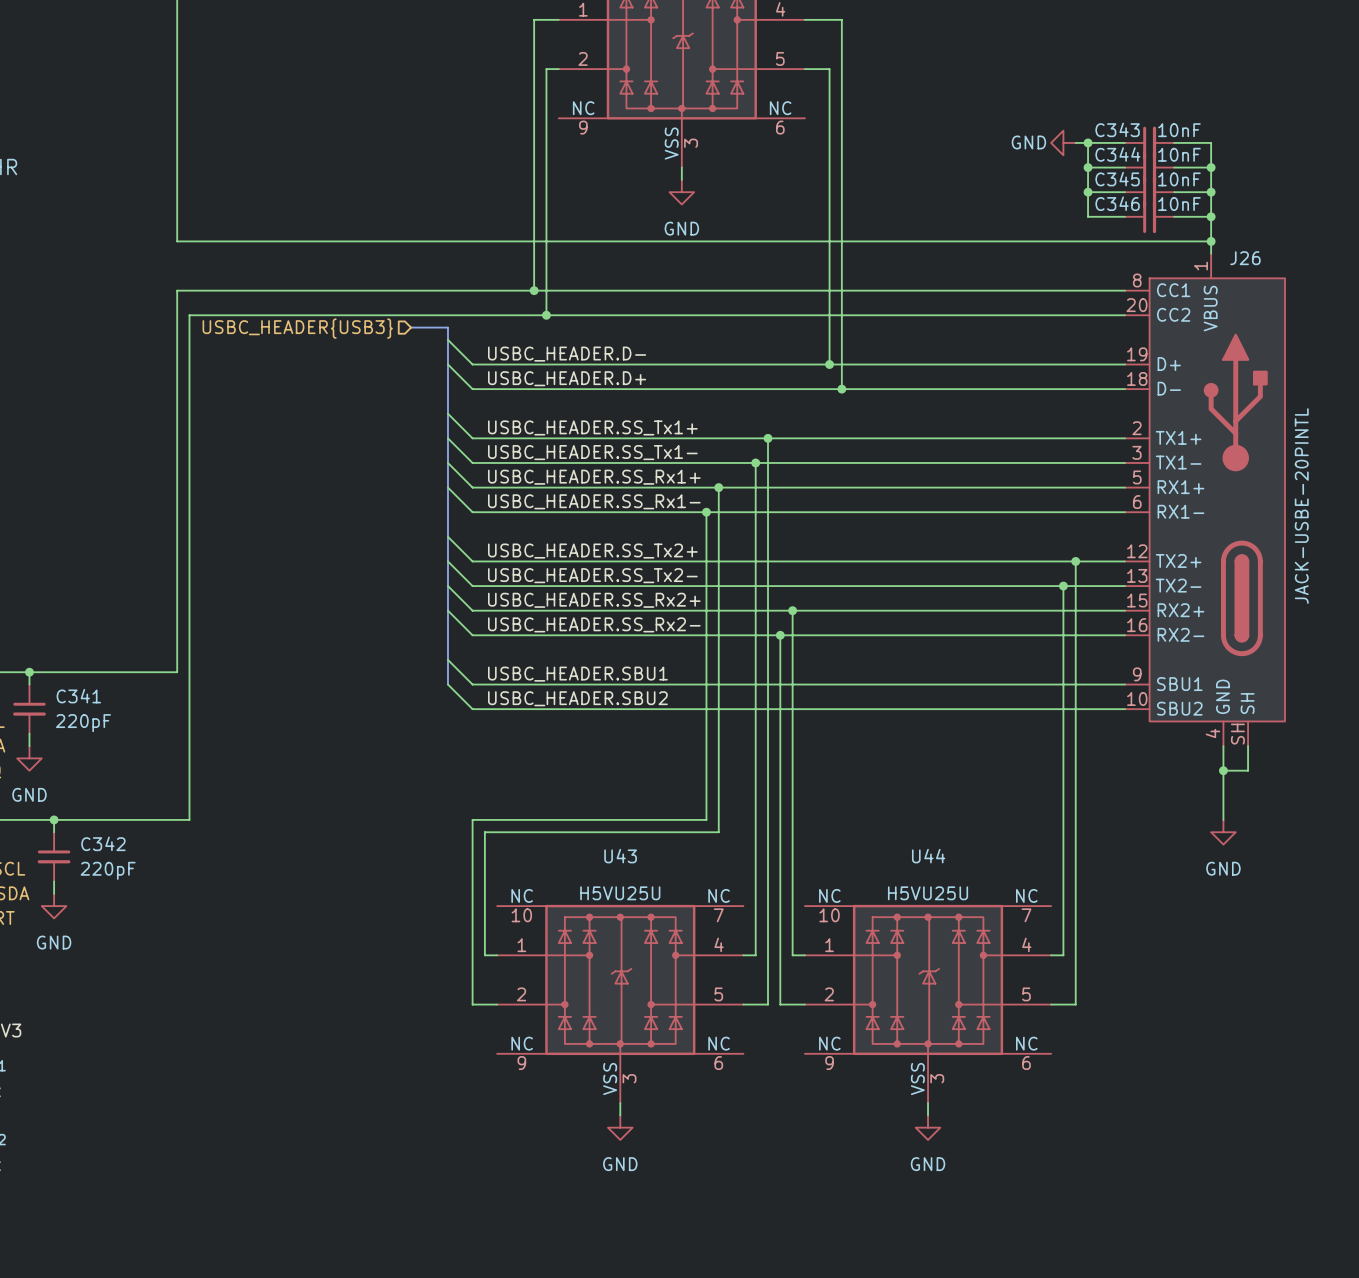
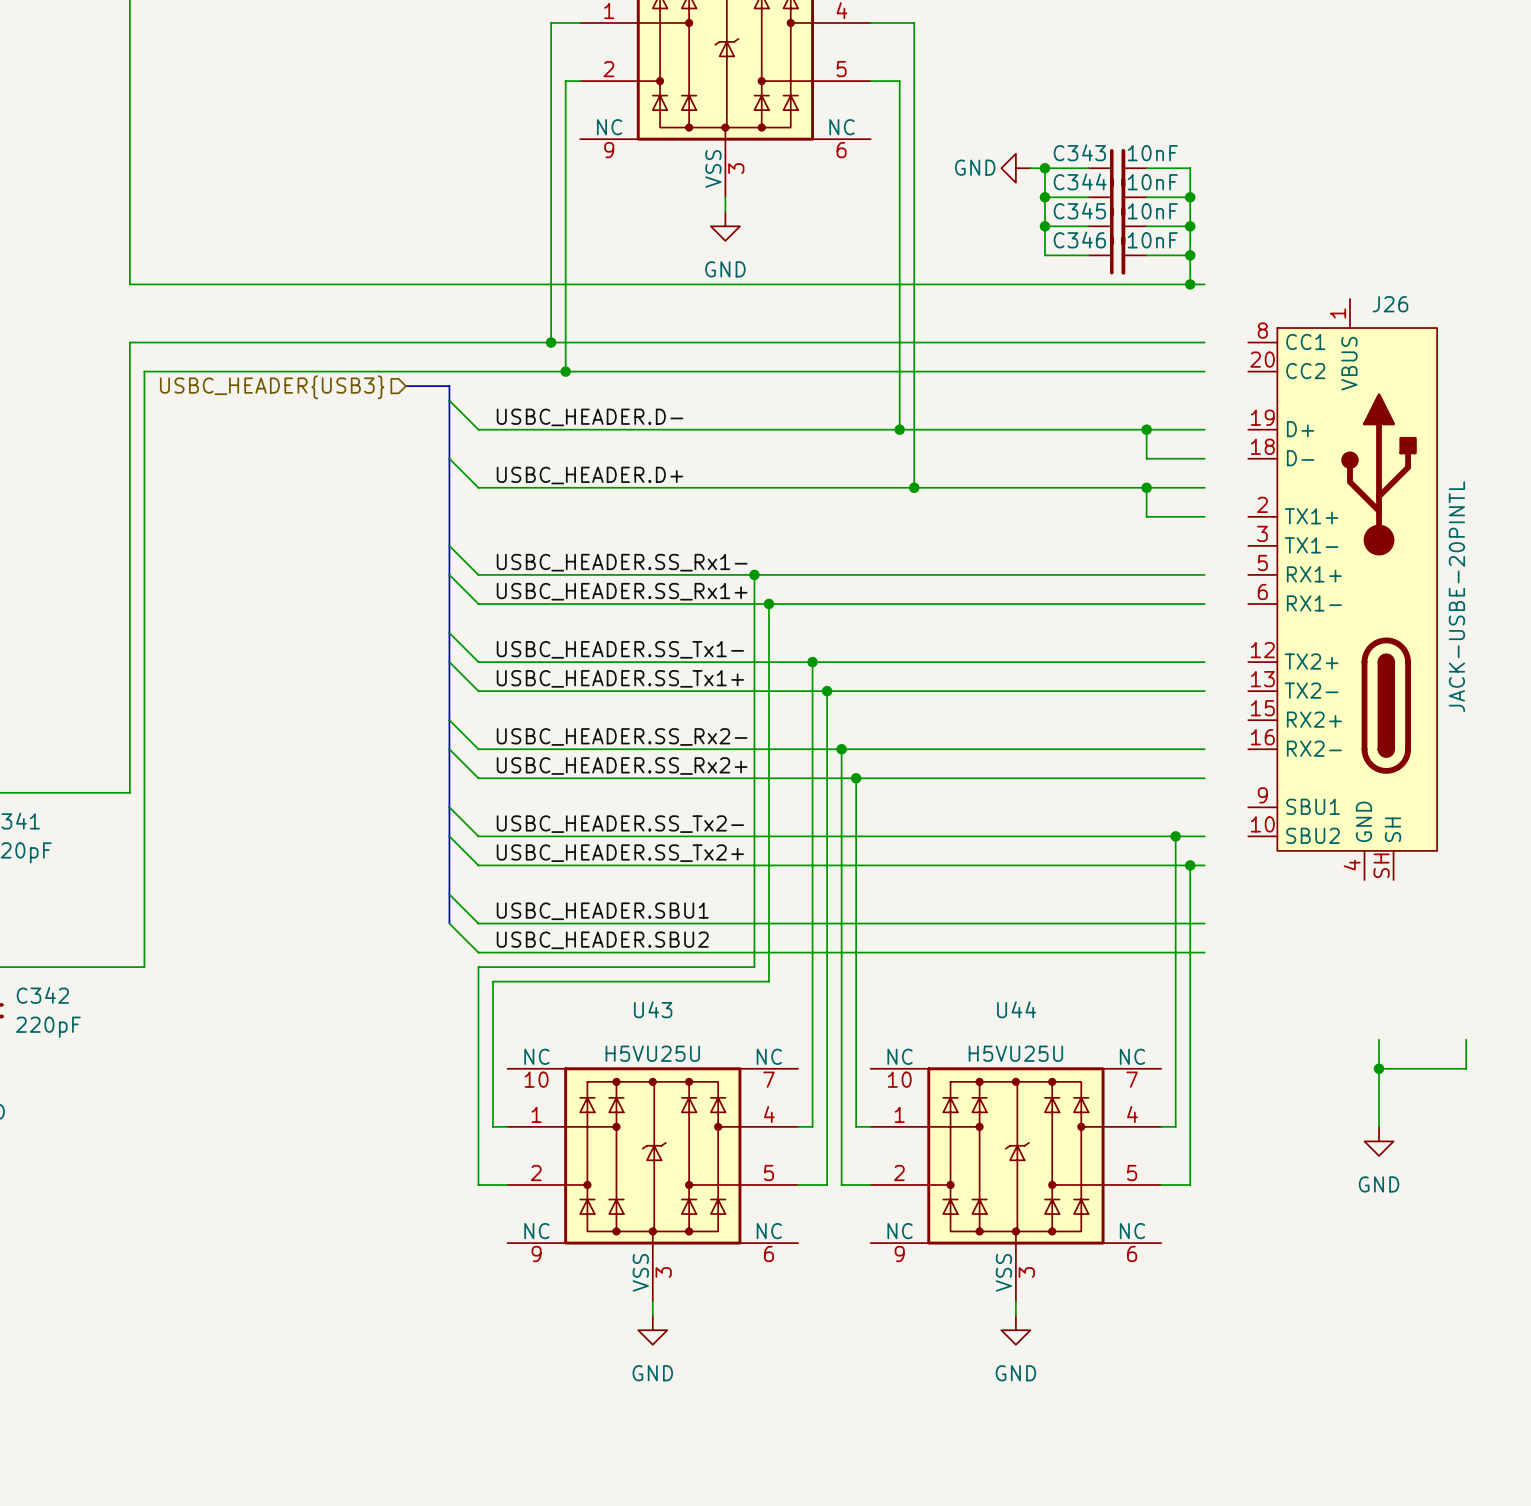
junction: none -> (1044, 168)
wire: none -> (1146, 168) (1190, 168) (1190, 284)
power symbol position: GND (1063, 142) -> GND (1015, 168)
wire: (1075, 142) (1124, 142) -> (1030, 168) (1088, 168)
wire: (1088, 142) (1088, 216) (1124, 216) -> (1044, 168) (1044, 255) (1088, 255)
junction: (1088, 142) -> none
C343 position: (1149, 142) -> (1117, 168)
wire: (1174, 142) (1211, 142) (1211, 253) -> none
junction: none -> (1044, 197)
wire: (1088, 167) (1124, 167) -> (1044, 197) (1088, 197)
junction position: (1088, 167) -> (1190, 197)
C344 position: (1149, 167) -> (1117, 197)
wire: (1174, 167) (1211, 167) -> (1146, 197) (1190, 197)
junction: (1211, 167) -> none
junction: none -> (1044, 226)
wire: (1088, 192) (1124, 192) -> (1044, 226) (1088, 226)
junction position: (1088, 192) -> (1190, 226)
C345 position: (1149, 192) -> (1117, 226)
wire: (1174, 192) (1211, 192) -> (1146, 226) (1190, 226)
junction: (1211, 192) -> none
junction: none -> (1190, 255)
C346 position: (1149, 216) -> (1117, 255)
wire: (1174, 216) (1211, 216) -> (1146, 255) (1190, 255)
junction: (1211, 216) -> none
junction: none -> (1190, 284)
wire: (1088, 241) (1211, 241) -> none
junction: (1211, 241) -> none
wire: (1088, 290) (1124, 290) -> none
wire: (1088, 315) (1124, 315) -> none
wire: (447, 364) (472, 389) (1038, 389) -> (1146, 429) (1146, 458)
junction: none -> (1146, 429)
wire: (1088, 364) (1124, 364) -> none
label position: USBC_HEADER.D+ (567, 378) -> USBC_HEADER.D+ (589, 475)
wire: none -> (449, 458) (478, 487) (1204, 487)
wire: none -> (914, 458) (914, 487)
junction position: (841, 389) -> (914, 487)
wire: (1088, 389) (1124, 389) -> none
wire: (447, 413) (472, 438) (1038, 438) -> (1146, 487) (1146, 516)
junction: none -> (1146, 487)
label: USBC_HEADER.SS_Tx1+ (592, 427) -> none
wire: (447, 438) (472, 462) (1124, 462) -> none
wire: (768, 438) (768, 586) -> none
junction: (768, 438) -> none
wire: (1088, 438) (1124, 438) -> none
label: USBC_HEADER.SS_Tx1- (592, 452) -> none
wire: (755, 462) (755, 561) -> none
junction: (755, 462) -> none
label: USBC_HEADER.SS_Rx1+ (594, 477) -> USBC_HEADER.SS_Rx1- (622, 562)
junction: none -> (754, 574)
wire: (718, 487) (718, 512) -> (754, 574) (754, 603)
junction: (718, 487) -> none
wire: (1088, 487) (1124, 487) -> none
label: USBC_HEADER.SS_Rx1- (594, 501) -> USBC_HEADER.SS_Rx1+ (622, 591)
junction: (706, 512) -> none
junction: none -> (768, 603)
wire: (1088, 512) (1124, 512) -> none
label: USBC_HEADER.SS_Tx2+ (592, 551) -> USBC_HEADER.SS_Tx1- (620, 649)
junction: none -> (812, 662)
wire: (1075, 561) (1075, 733) -> none
junction: (1075, 561) -> none
wire: (1088, 561) (1124, 561) -> none
label: USBC_HEADER.SS_Tx2- (592, 575) -> USBC_HEADER.SS_Tx1+ (620, 678)
wire: (447, 586) (472, 610) (1124, 610) -> none
junction: none -> (827, 691)
wire: (1063, 586) (1063, 709) -> none
junction: (1063, 586) -> none
wire: (1088, 586) (1124, 586) -> none
label position: USBC_HEADER.SS_Rx2+ (594, 600) -> USBC_HEADER.SS_Rx2+ (622, 766)
wire: (792, 610) (792, 659) -> none
junction: (792, 610) -> none
wire: none -> (449, 749) (478, 778) (1204, 778)
wire: (1088, 635) (1124, 635) -> none
wire: (447, 659) (472, 684) (1124, 684) -> none
junction: none -> (856, 778)
label position: USBC_HEADER.SBU1 (577, 674) -> USBC_HEADER.SBU1 (602, 911)
bus: none -> (449, 807) (449, 923)
label: USBC_HEADER.SBU2 (577, 698) -> USBC_HEADER.SS_Tx2- (620, 824)
wire: none -> (449, 836) (478, 865) (1204, 865)
junction: none -> (1175, 836)
wire: (1088, 709) (1124, 709) -> none
label: none -> USBC_HEADER.SS_Tx2+ (620, 853)
junction: none -> (1190, 865)
wire: (1223, 746) (1223, 819) -> (1379, 1039) (1379, 1126)
wire: (1248, 746) (1248, 770) (1223, 770) -> none
wire: none -> (449, 894) (478, 923) (1204, 923)
junction: (1223, 770) -> none
wire: none -> (449, 923) (478, 952) (1204, 952)
label: none -> USBC_HEADER.SBU2 (602, 940)
power symbol position: GND (1223, 832) -> GND (1379, 1141)
wire: none -> (1466, 1039) (1466, 1068) (1379, 1068)
junction: none -> (1379, 1068)

